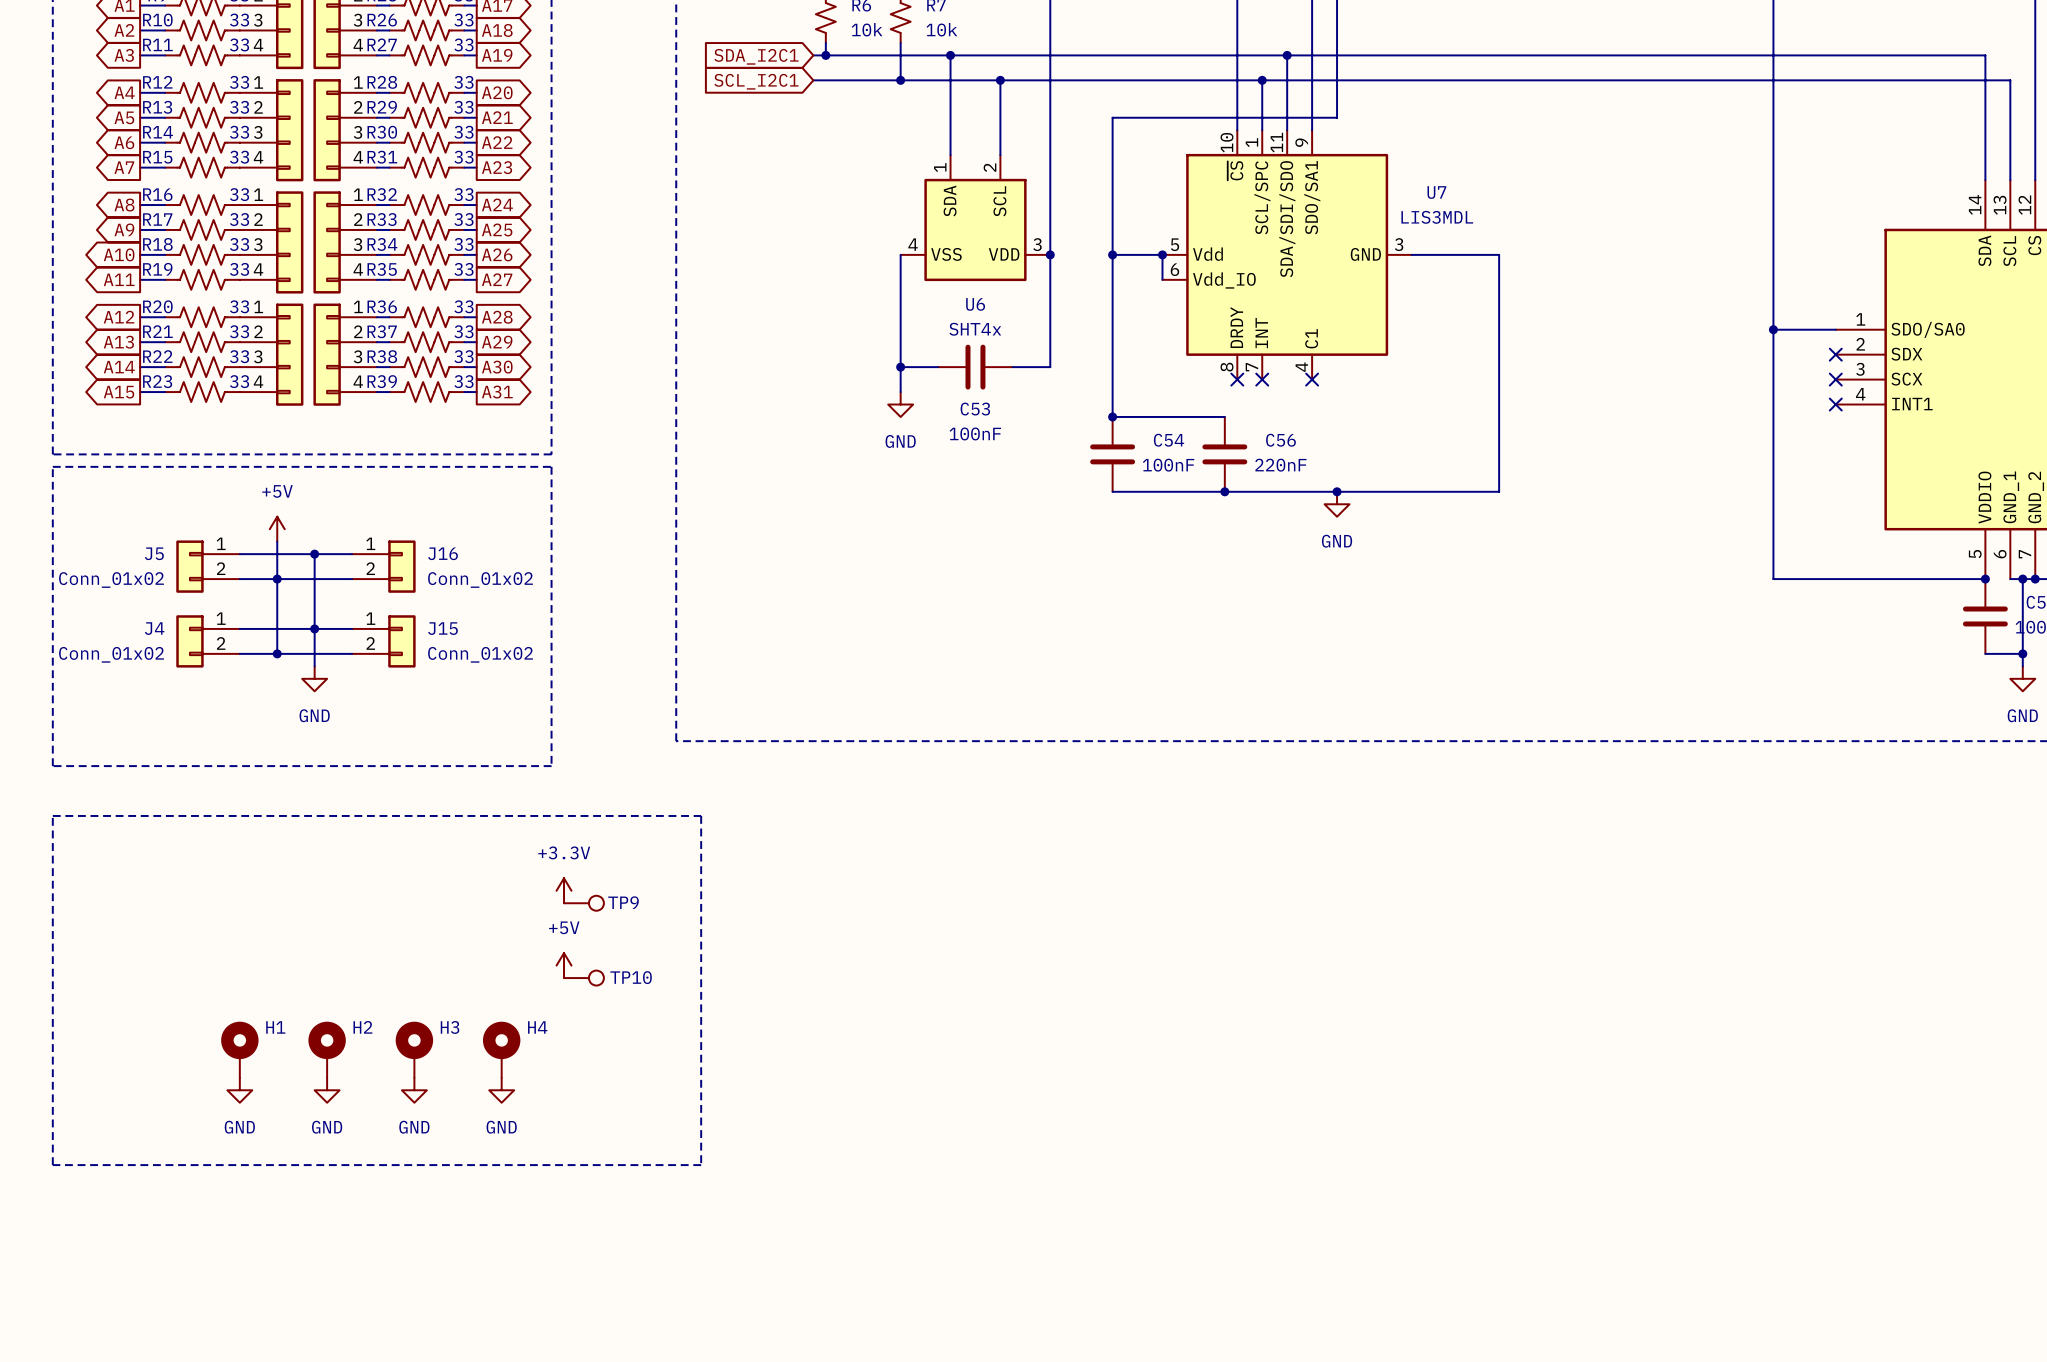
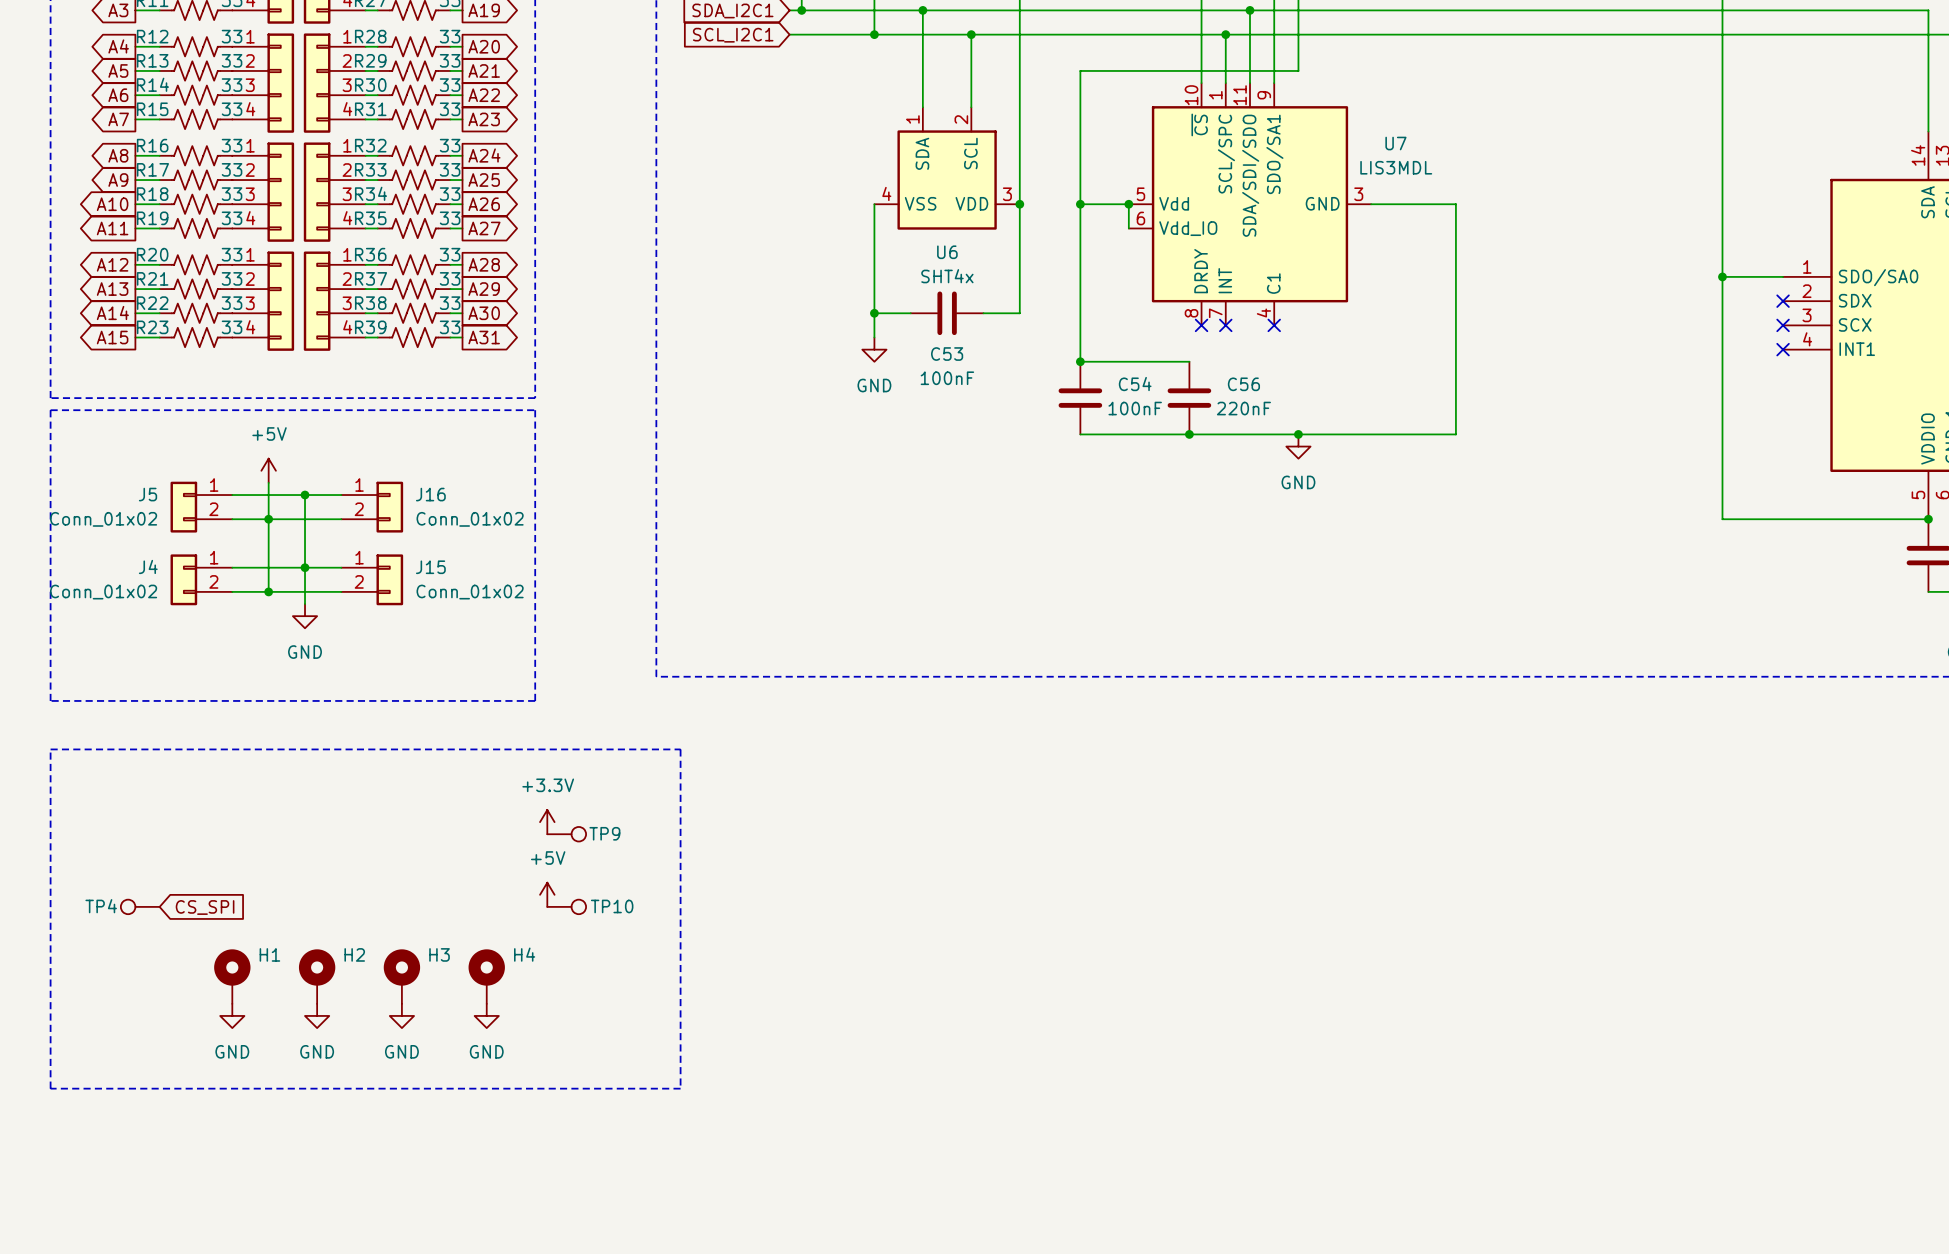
TP4: none -> (140, 906)
global label: none -> CS_SPI (205, 907)

